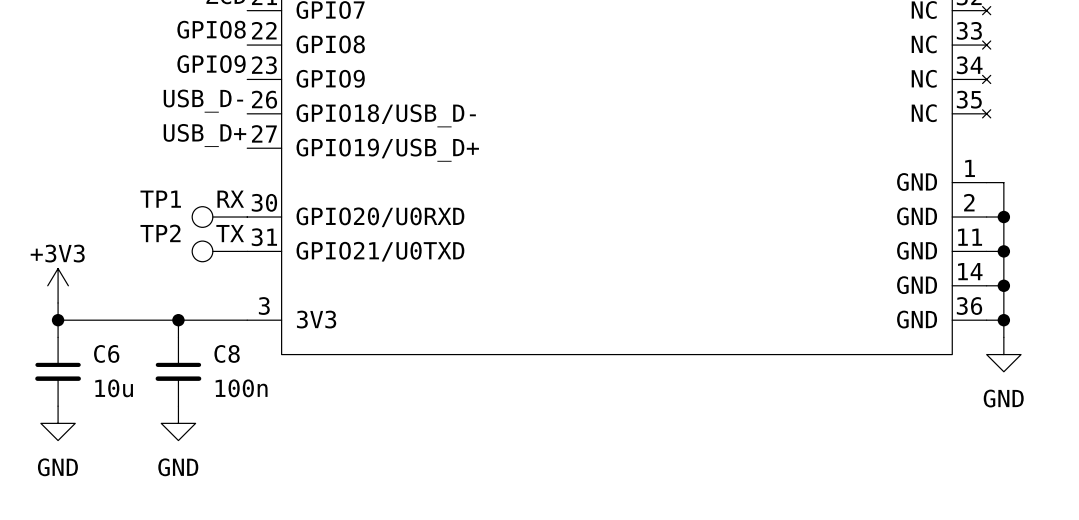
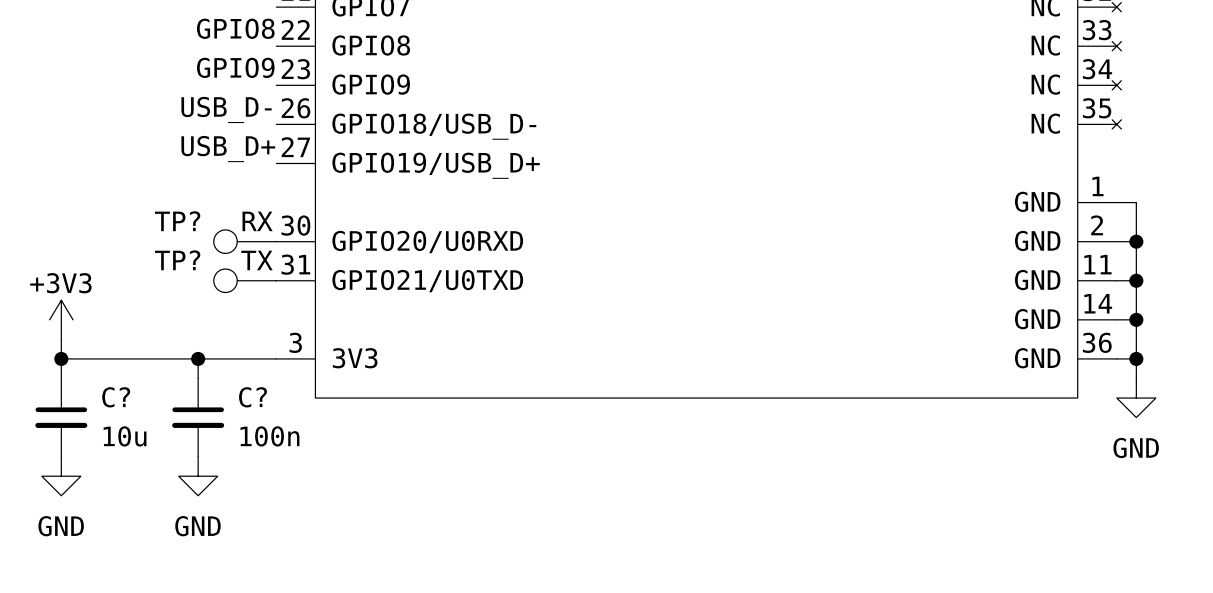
TP1 name: TP1 (160, 199) -> TP? (177, 221)
TP2 name: TP2 (160, 233) -> TP? (177, 260)
C6 name: C6 (106, 353) -> C? (116, 397)
C8 name: C8 (227, 353) -> C? (253, 397)

